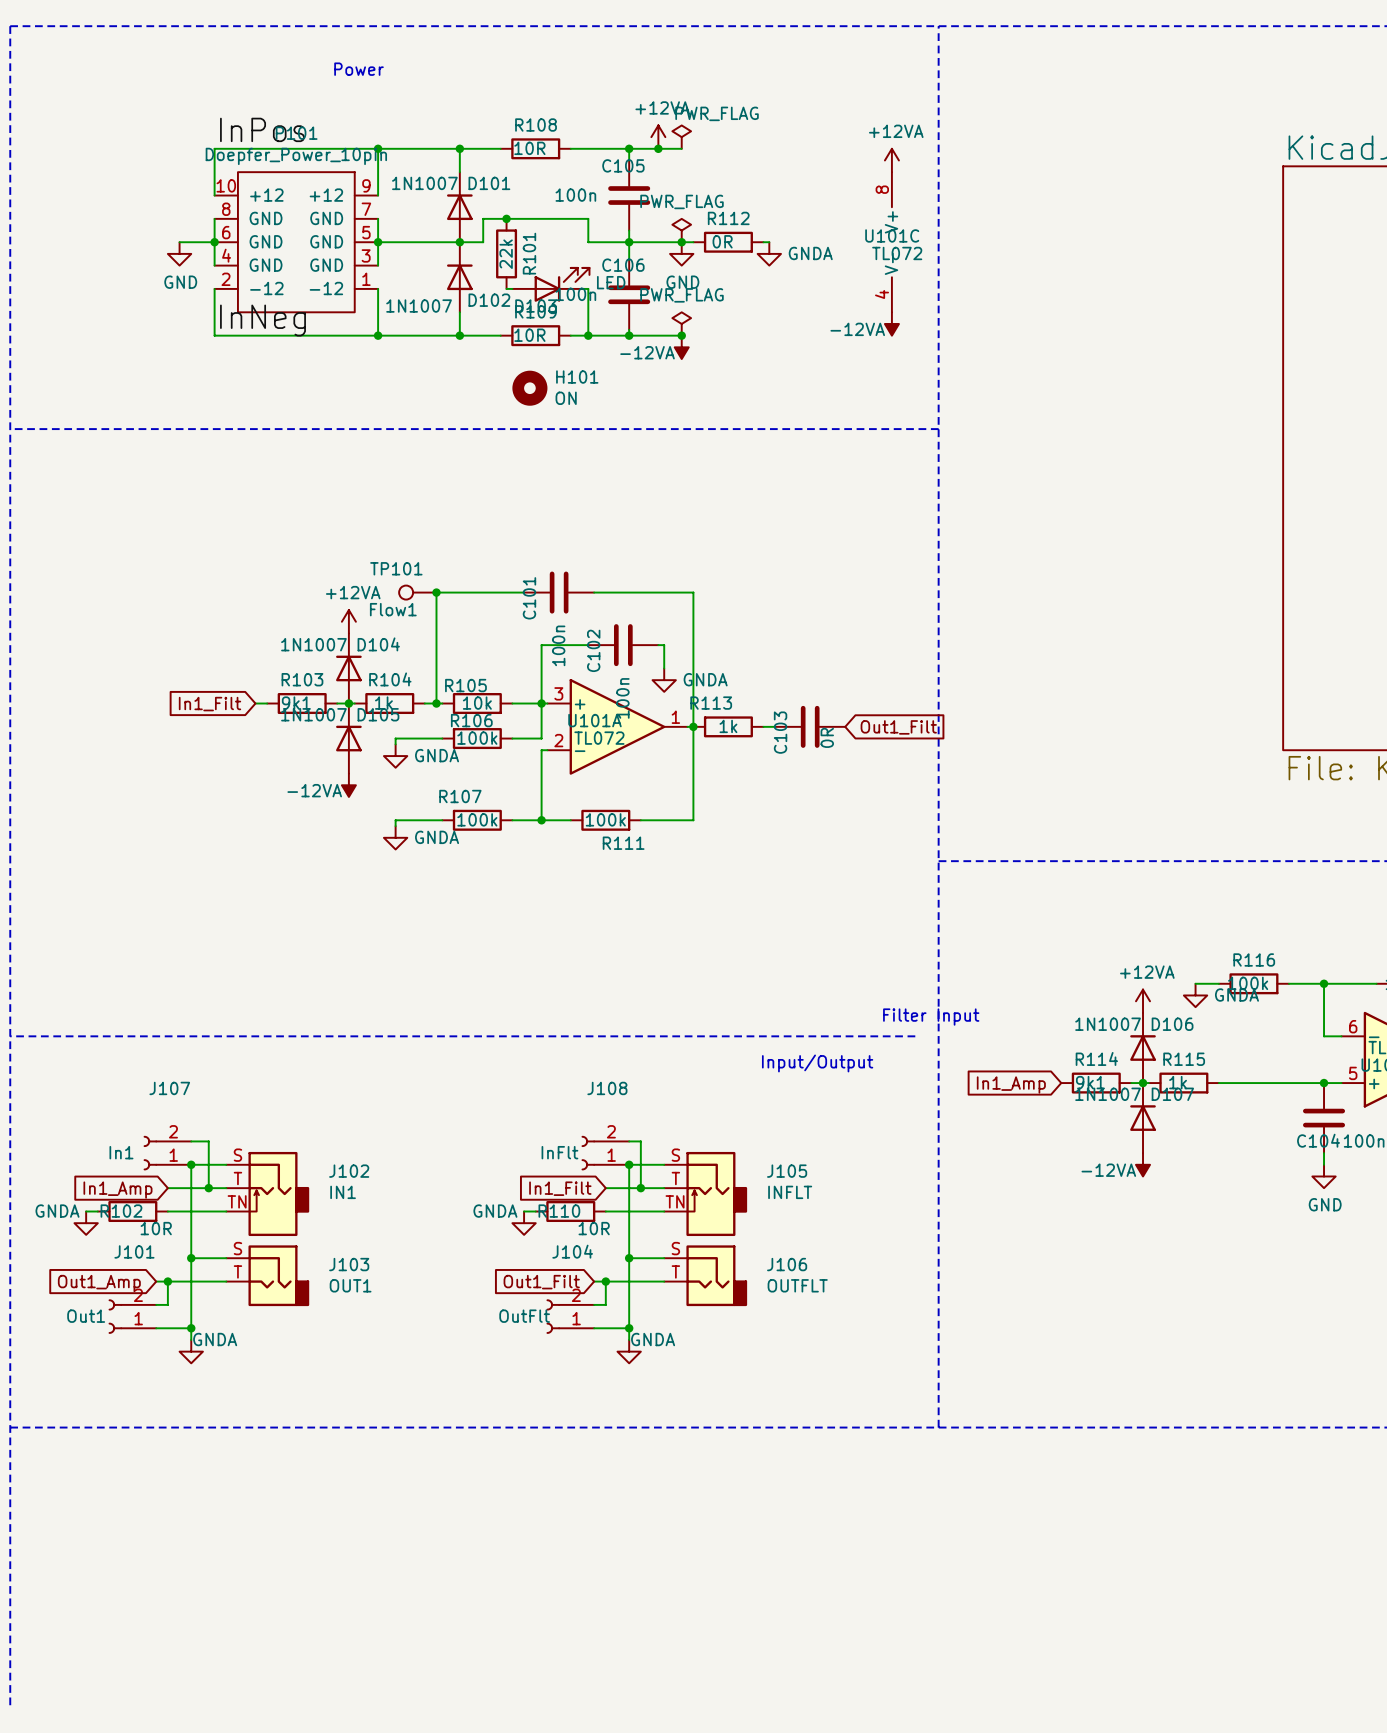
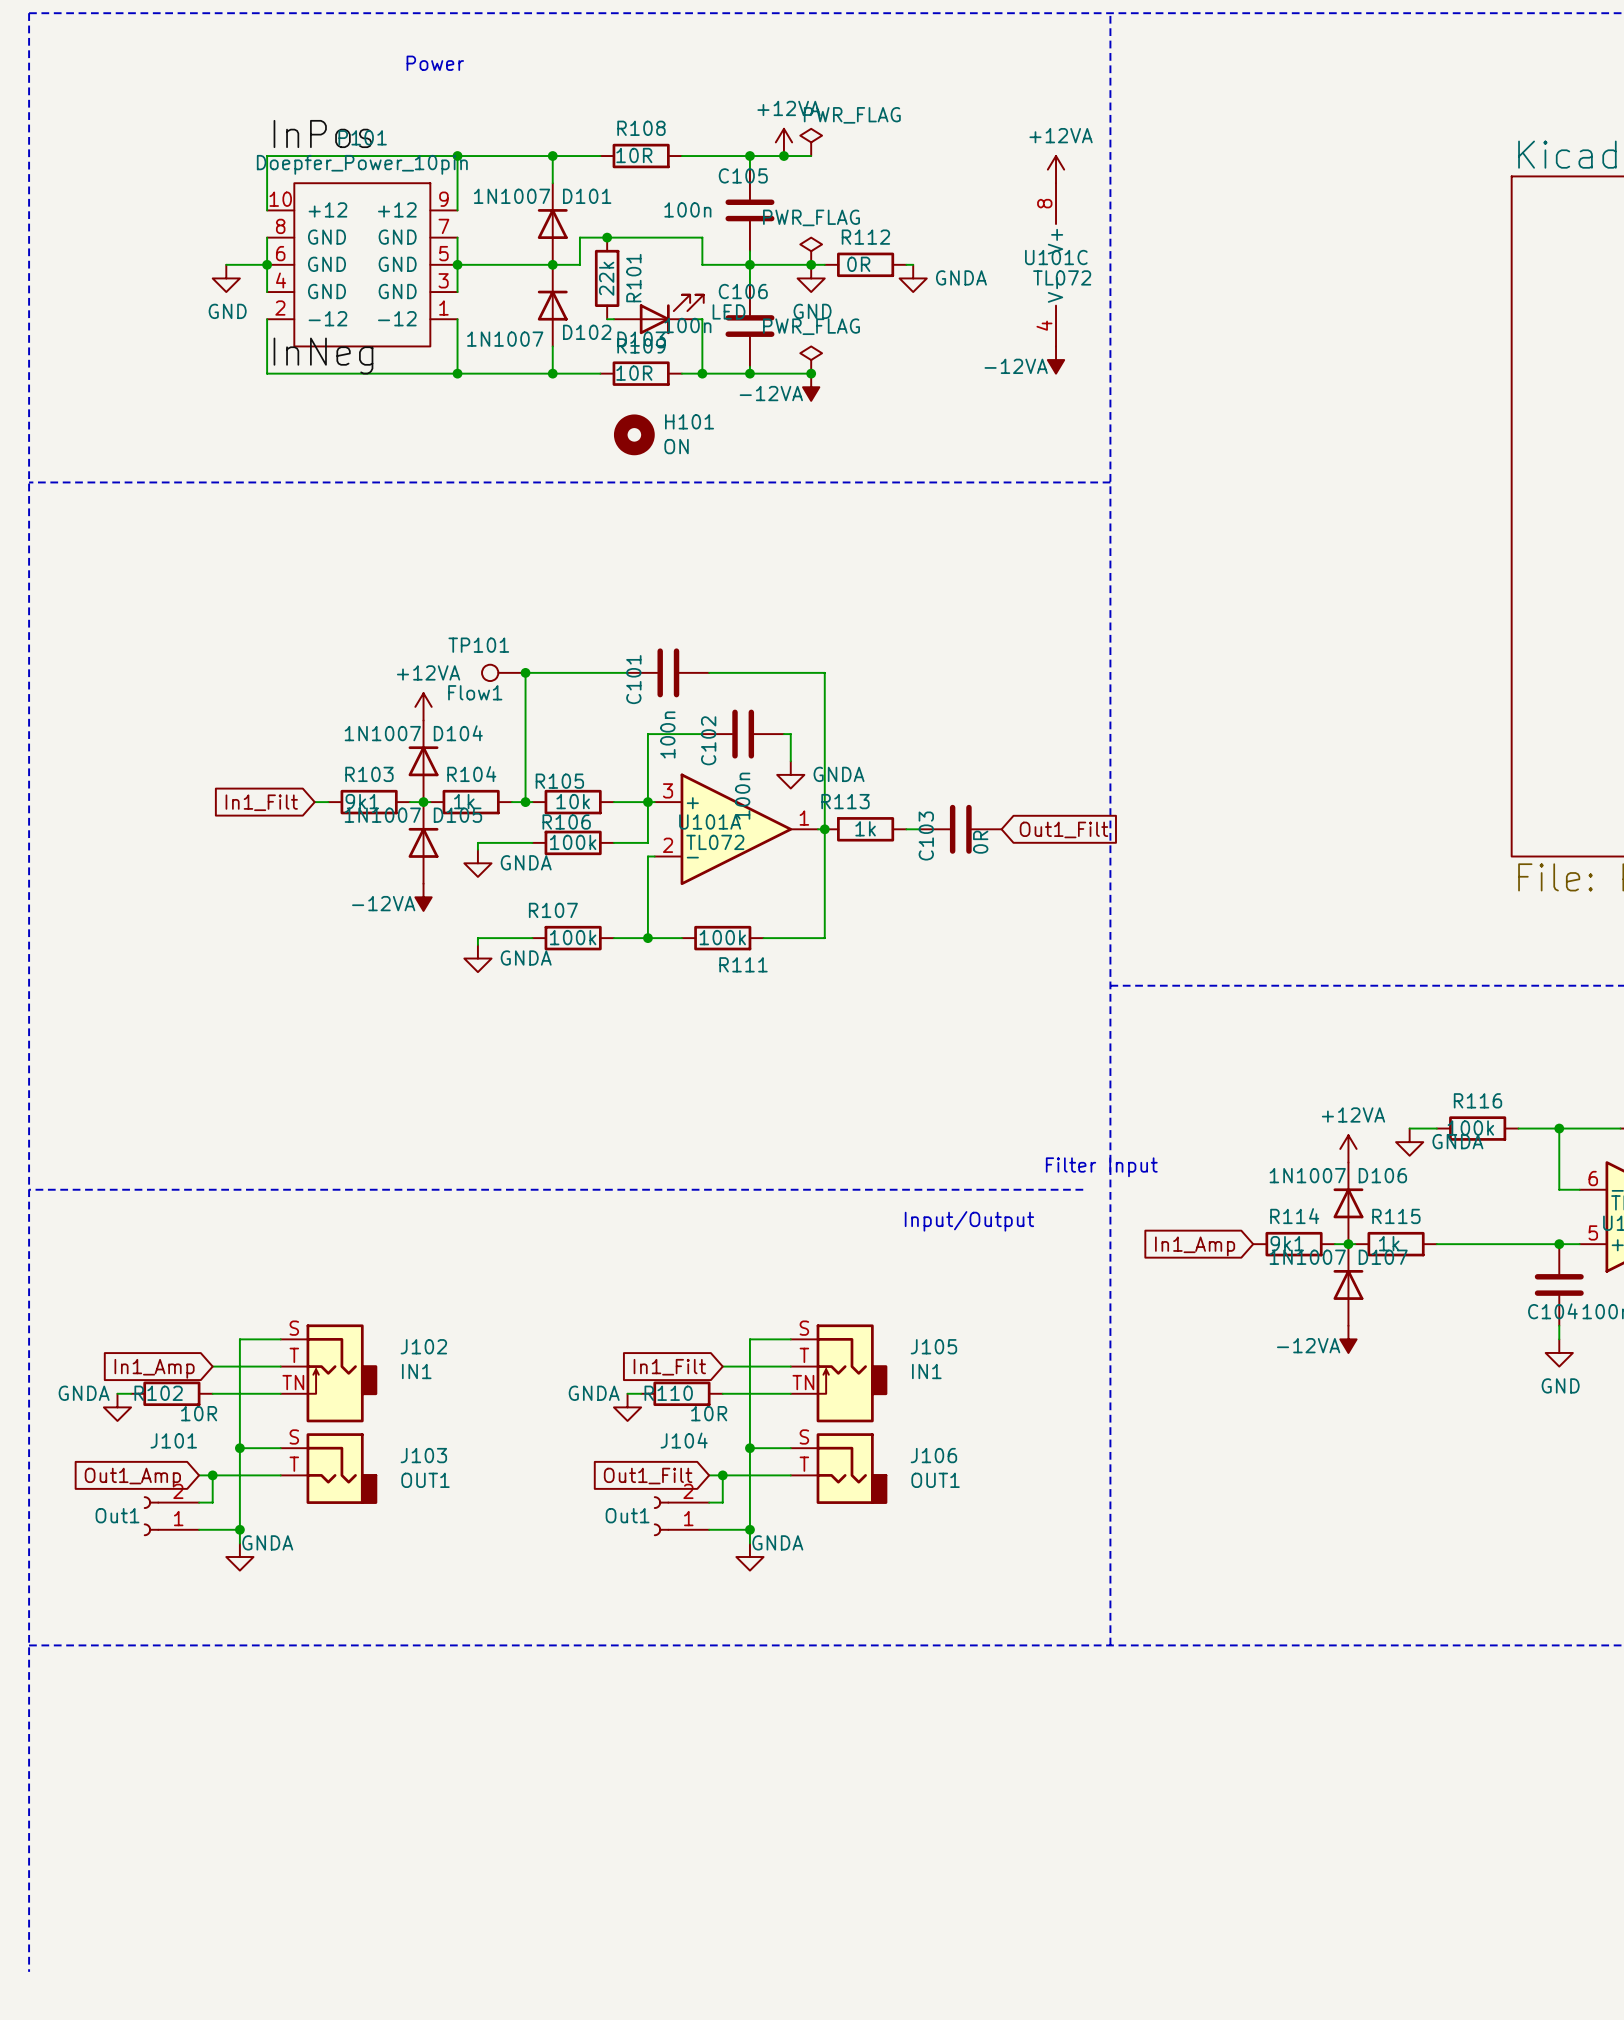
wire: (191, 1141) (208, 1141) (208, 1188) -> none
wire: (629, 1141) (640, 1141) (640, 1188) -> none
J107: In1 (167, 1153) -> none
J108: InFlt (605, 1153) -> none
junction: (191, 1164) -> none
junction: (629, 1164) -> none
junction: (208, 1188) -> none
junction: (640, 1188) -> none
J105 value: INFLT (790, 1192) -> IN1 (926, 1371)
J106 value: OUTFLT (797, 1285) -> OUT1 (935, 1480)
J104 value: OutFlt (524, 1316) -> Out1 (627, 1515)

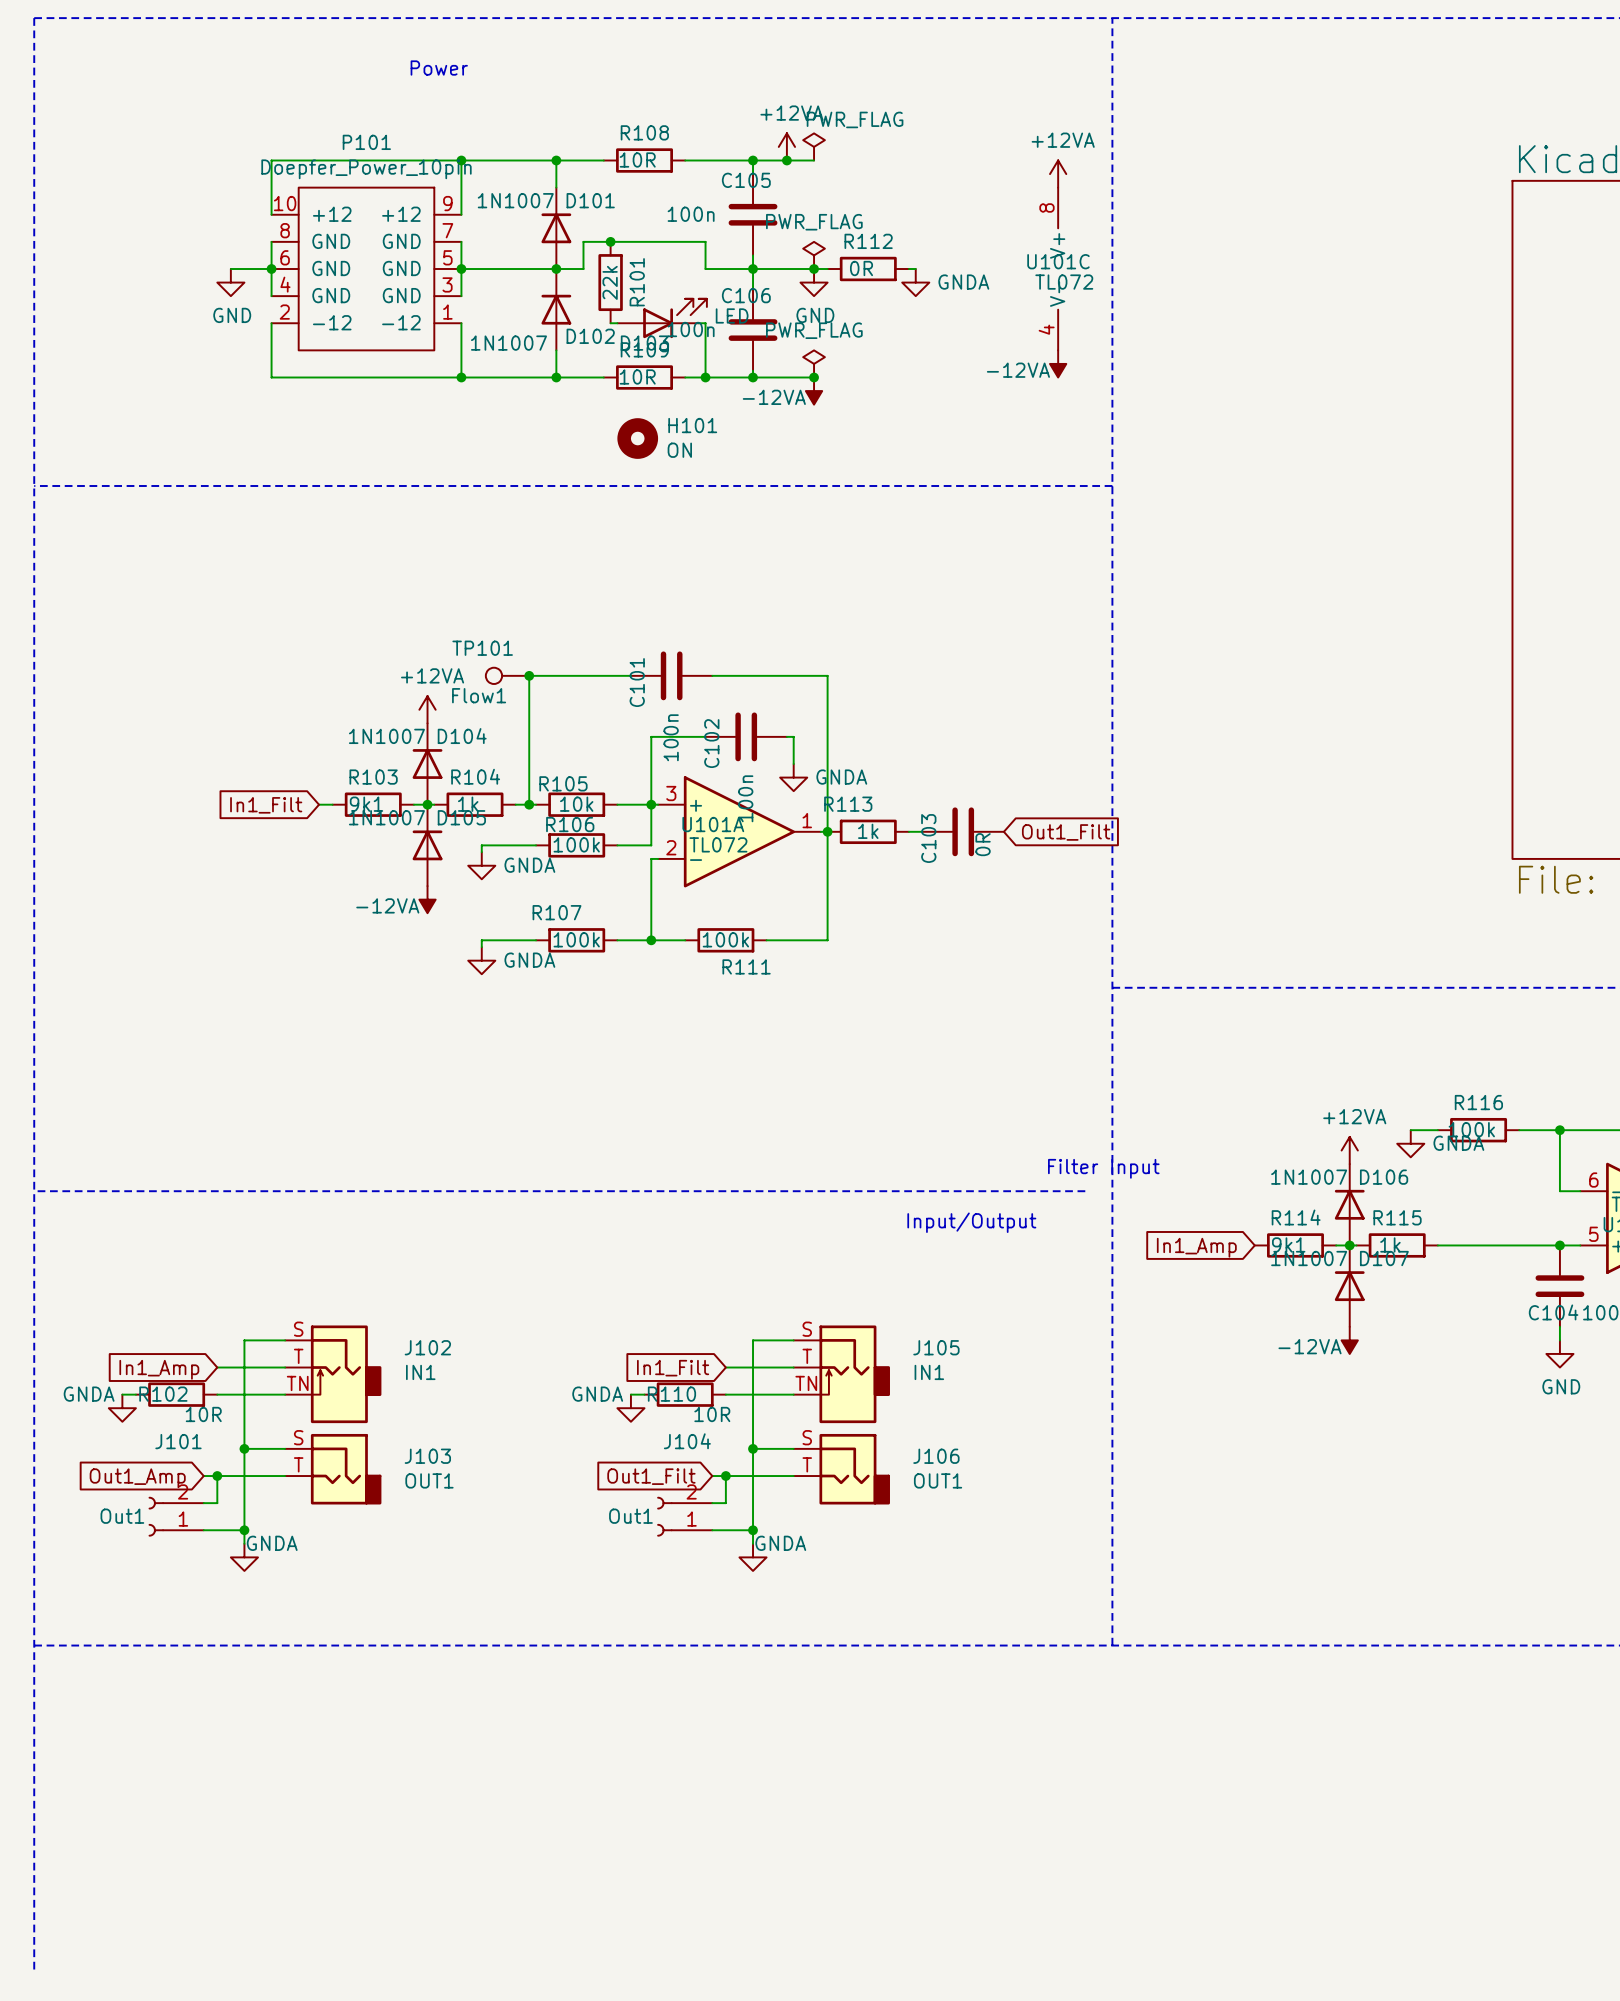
label: InPos (322, 134) -> none
label: InNeg (323, 356) -> none

